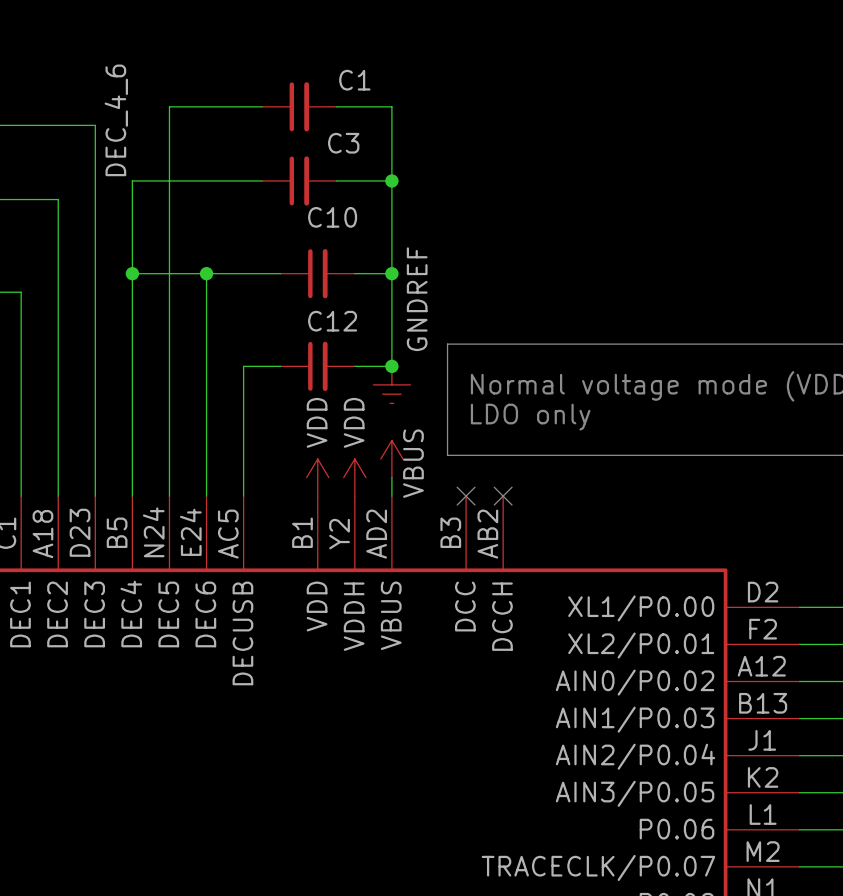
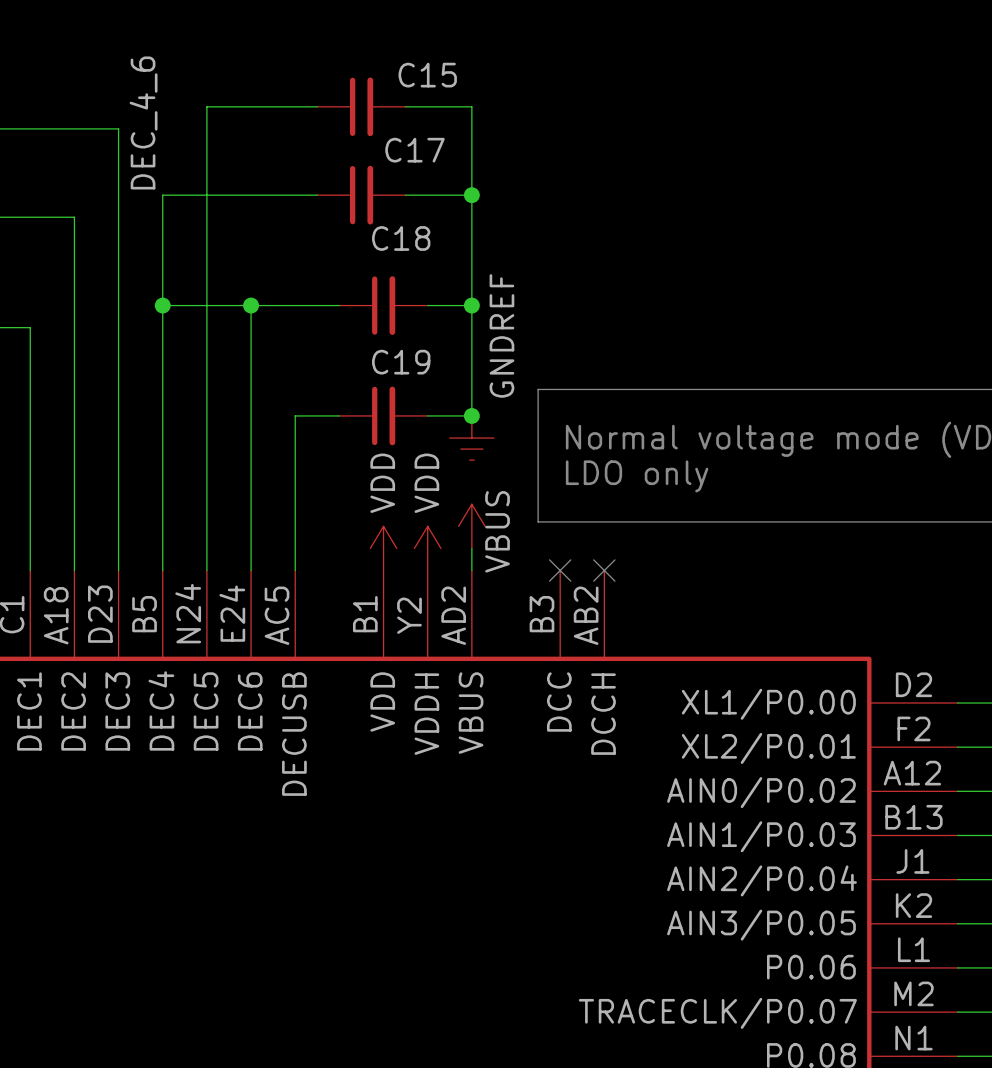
C1 name: C1 (354, 80) -> C15 (427, 75)
C3 name: C3 (343, 143) -> C17 (414, 150)
C10 name: C10 (332, 217) -> C18 (401, 238)
C12 name: C12 (332, 321) -> C19 (401, 362)

